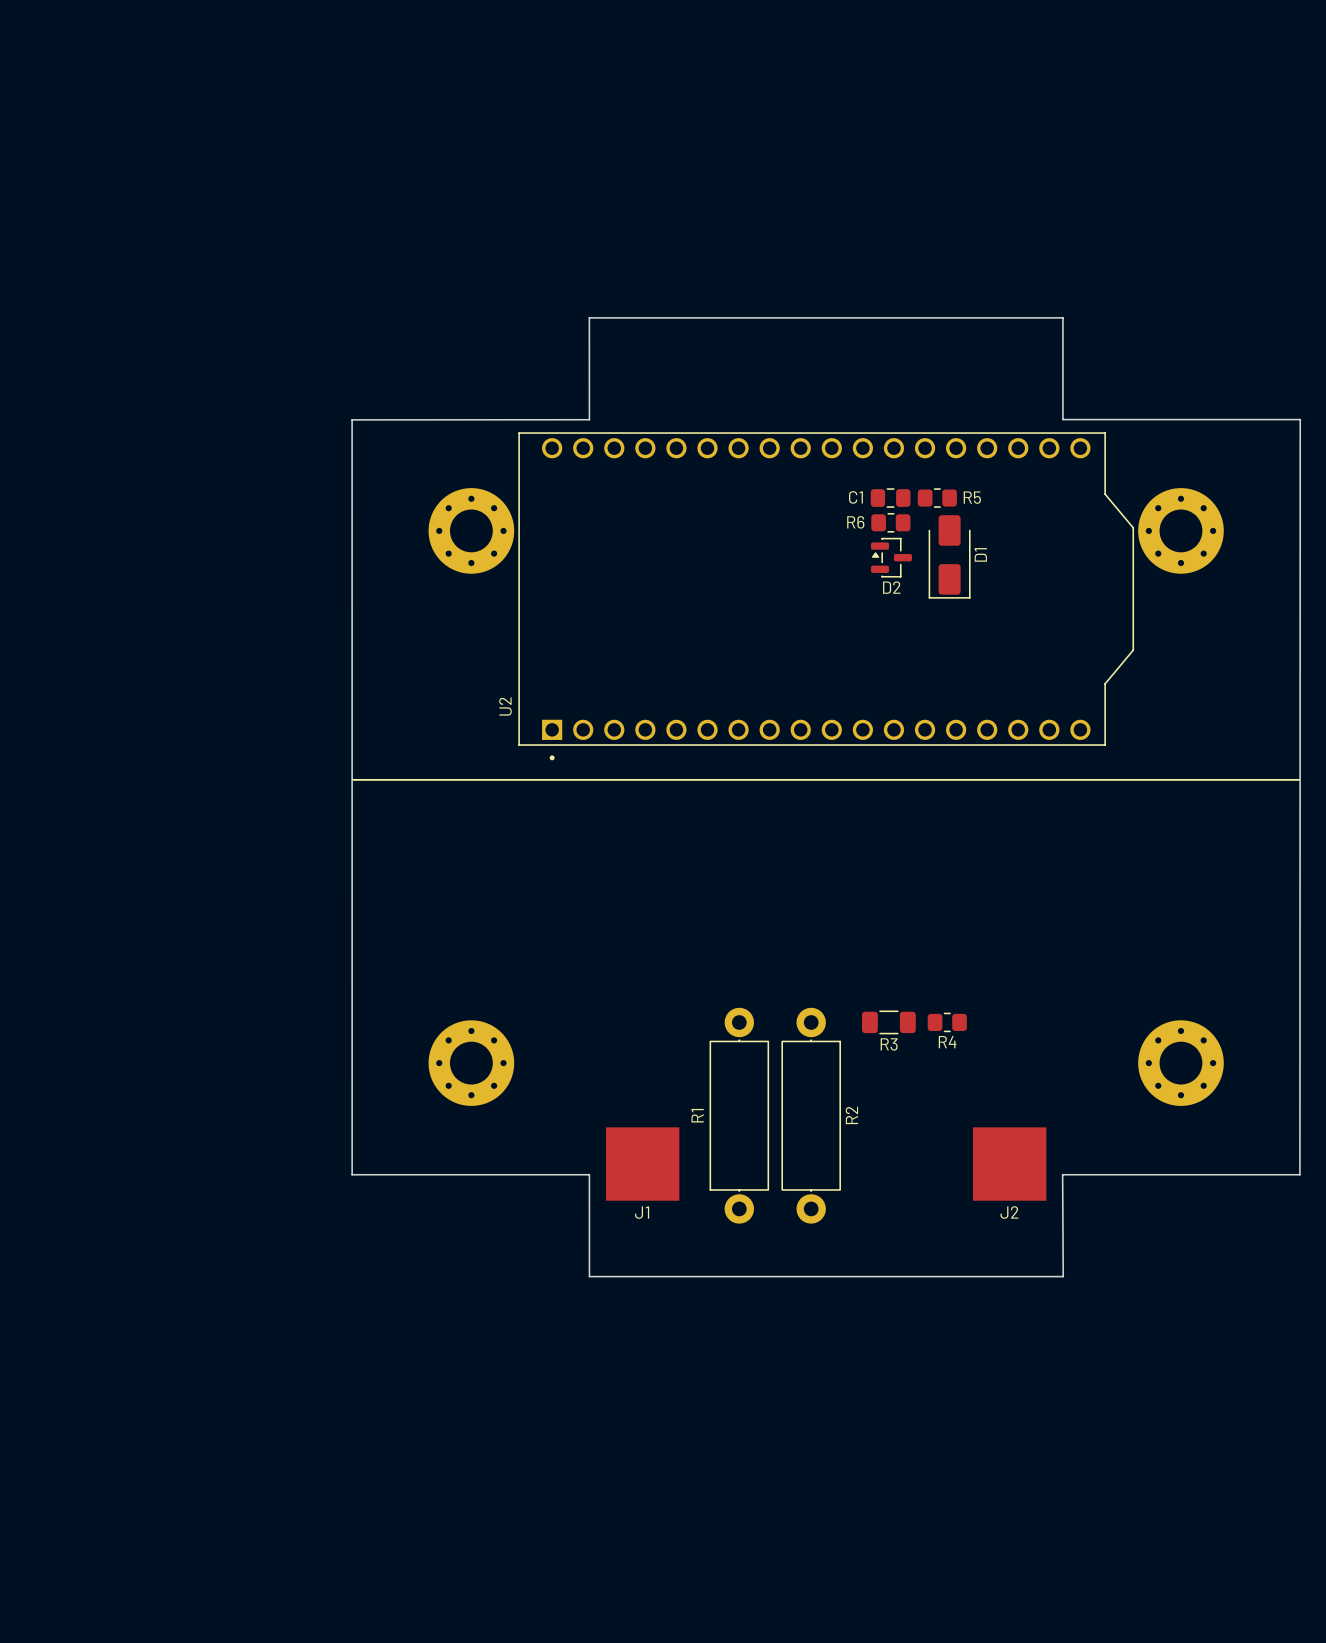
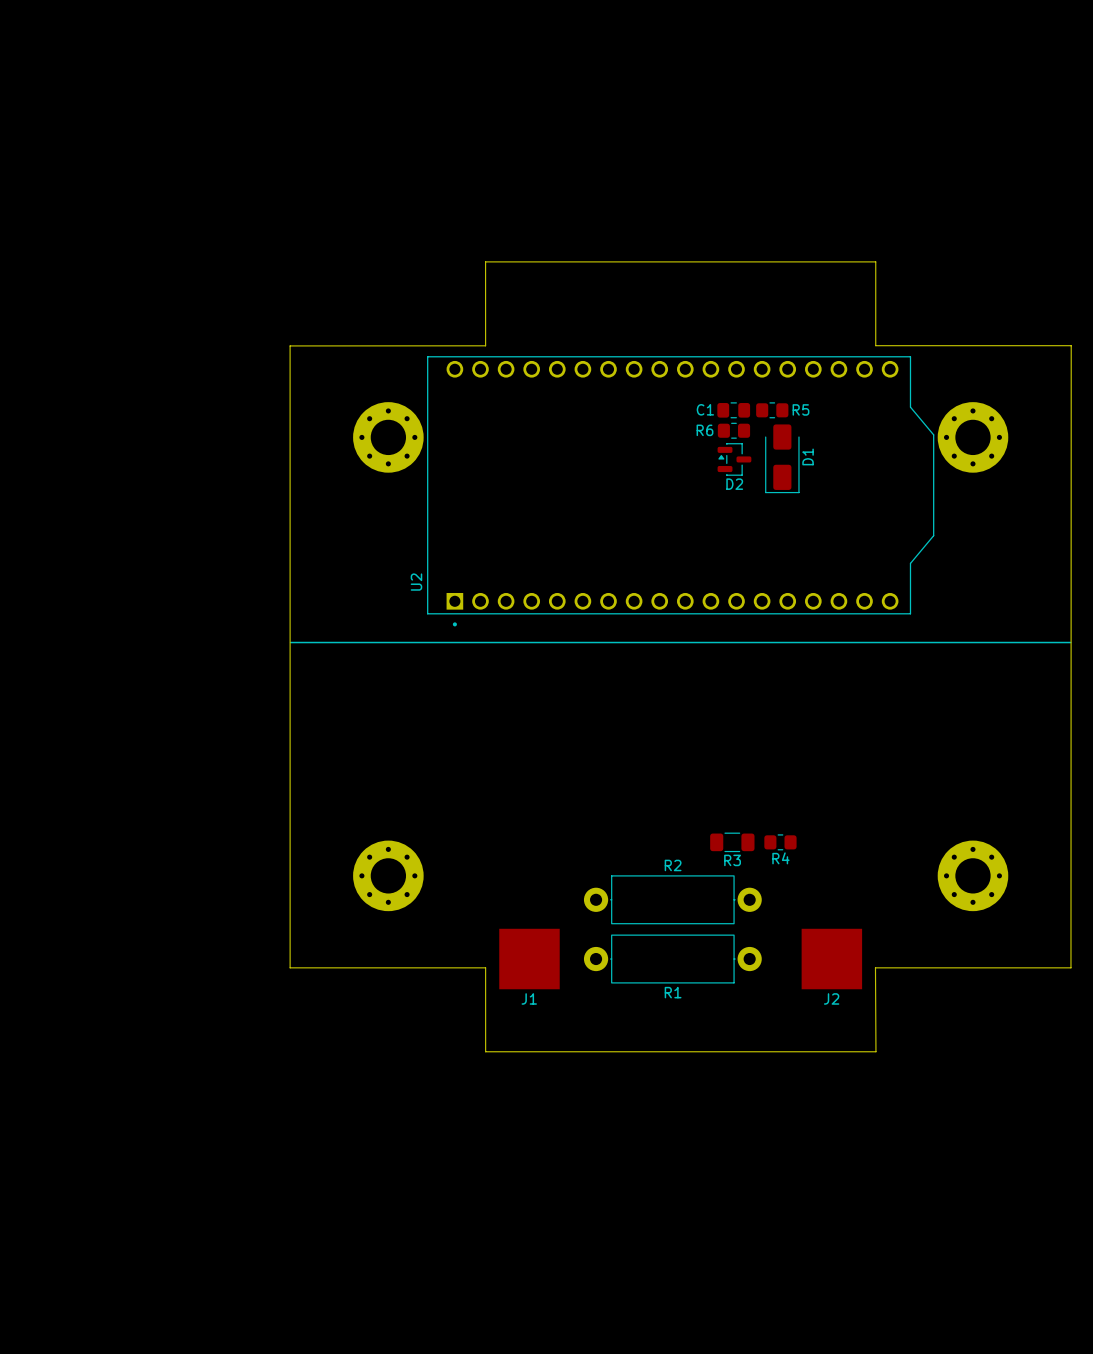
R1 name position: R1 (697, 1115) -> R1 (673, 992)
R1 rotation: 0° (739, 1115) -> 90° clockwise (672, 959)
R2 rotation: 0° (811, 1115) -> 90° clockwise (672, 899)
R2 name position: R2 (851, 1115) -> R2 (673, 865)

